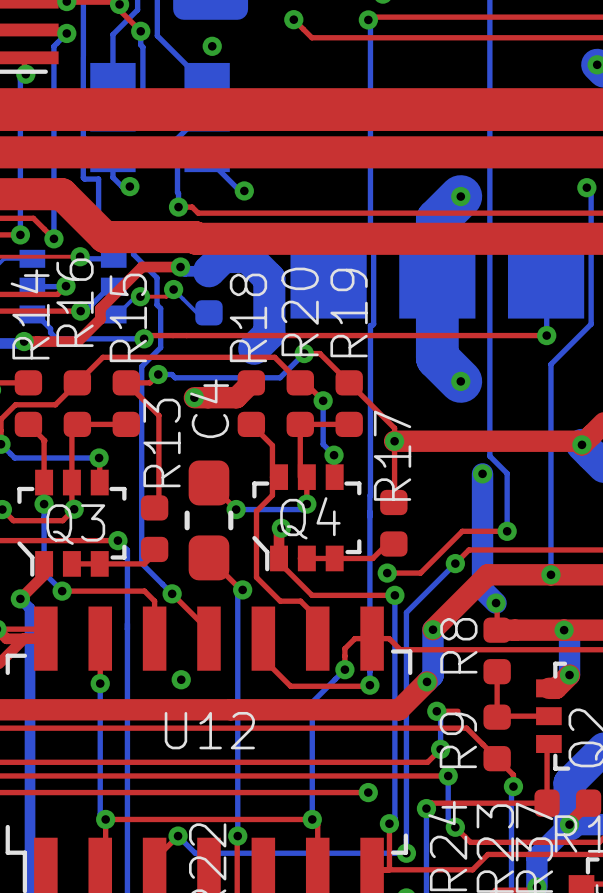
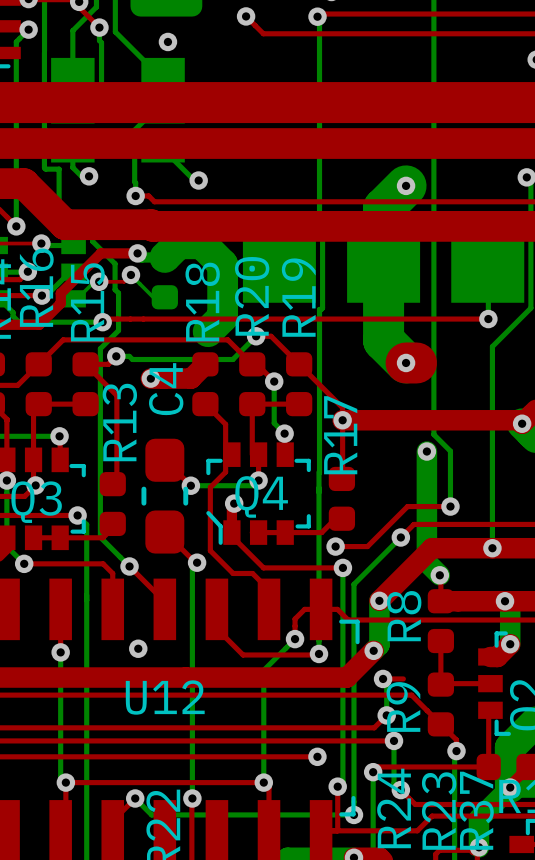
top track: none -> (406, 362) (416, 362)

